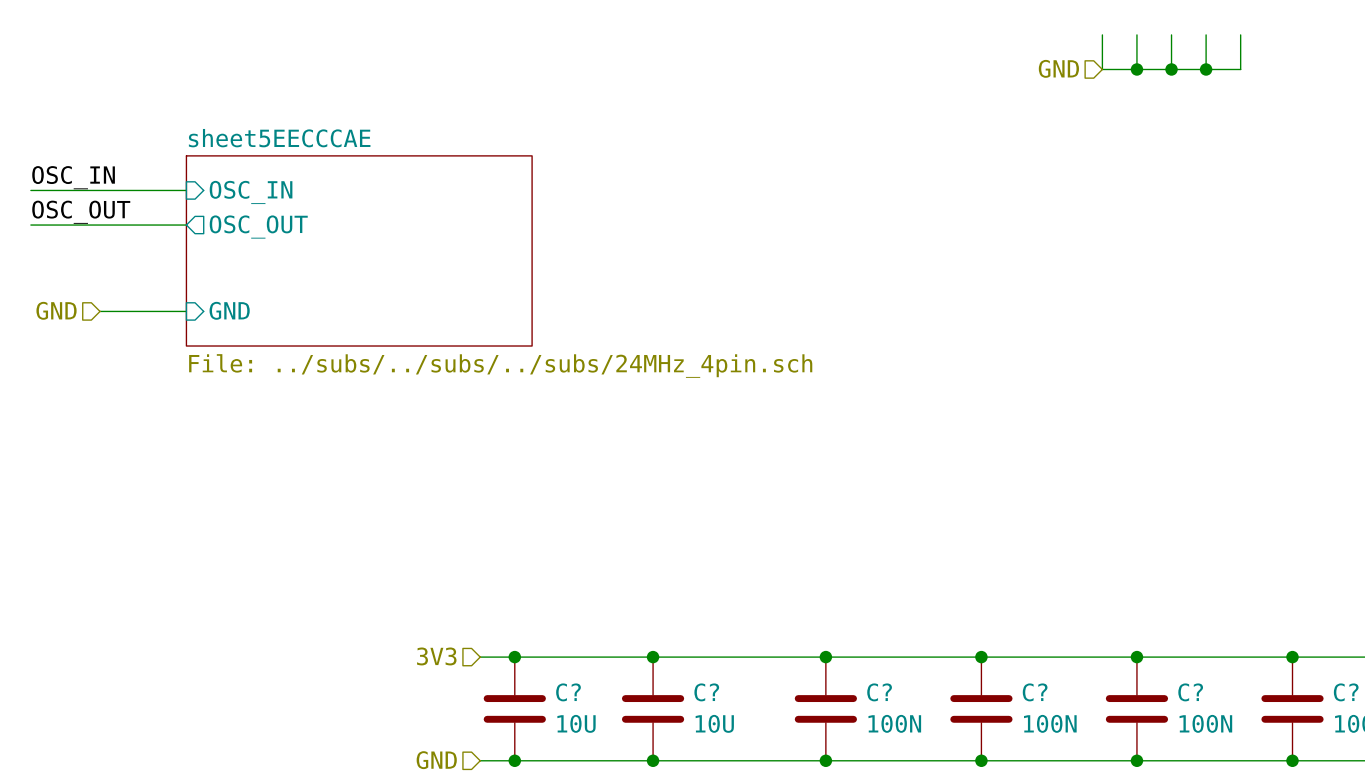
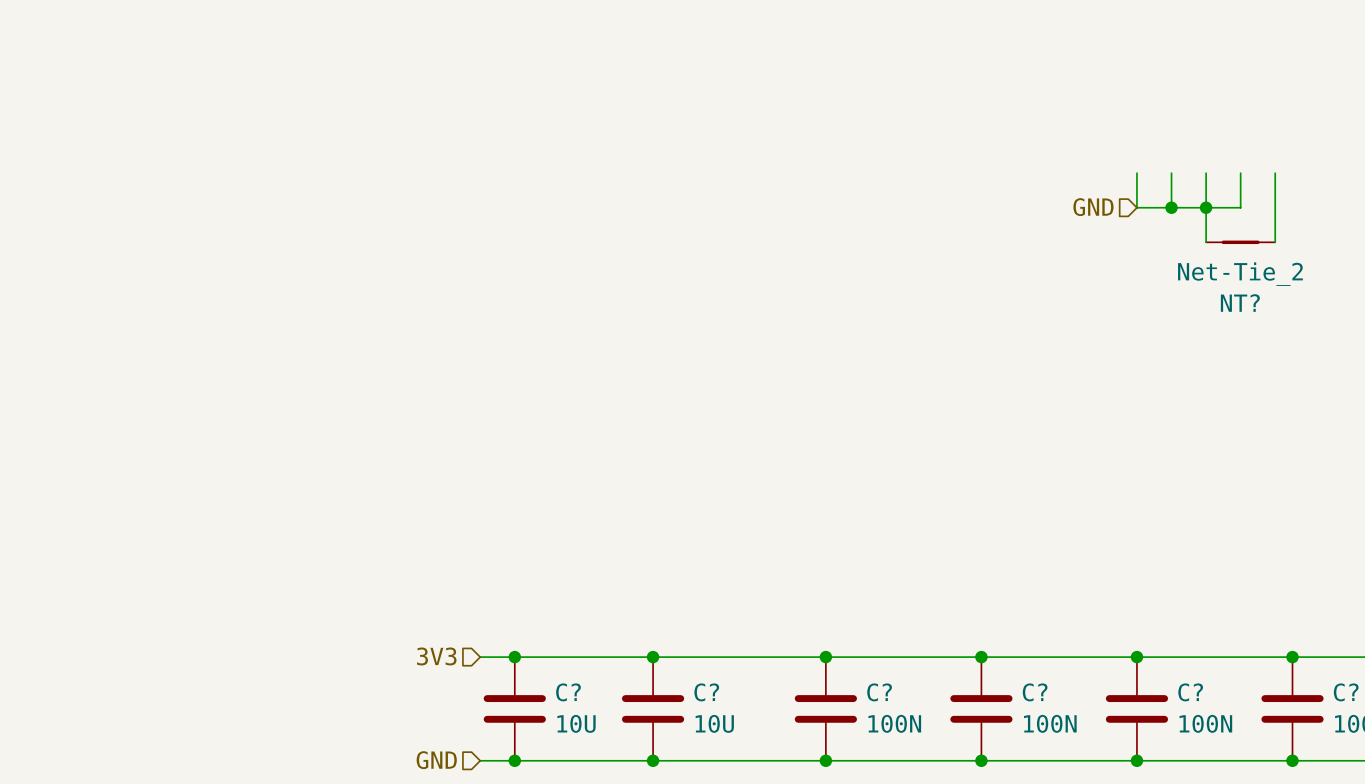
wire: (1102, 34) (1102, 69) (1240, 69) (1240, 34) -> none
wire: (1136, 34) (1136, 69) -> none
wire: (1171, 34) (1171, 69) -> (1171, 173) (1171, 207)
wire: (1206, 34) (1206, 69) -> none
hierarchical label position: GND (1058, 68) -> GND (1093, 207)
junction: (1136, 69) -> none
junction: (1171, 69) -> none
junction: (1206, 69) -> none
wire: none -> (1136, 173) (1136, 207) (1240, 207) (1240, 173)
wire: none -> (1206, 173) (1206, 242)
wire: none -> (1275, 173) (1275, 242)
label: OSC_IN (73, 177) -> none
wire: (30, 190) (186, 190) -> none
sheet pin: OSC_IN (251, 192) -> none
junction: none -> (1171, 207)
junction: none -> (1206, 207)
label: OSC_OUT (81, 212) -> none
wire: (30, 225) (186, 225) -> none
sheet pin: OSC_OUT (258, 227) -> none
NT?: none -> Net-Tie_2 (1240, 242)
sheet sheet5EECCCAE: File: ../subs/../subs/../subs/24MHz_4pin.sch (359, 250) -> none
hierarchical label: GND (56, 310) -> none
sheet pin: GND (229, 310) -> none
wire: (100, 311) (186, 311) -> none

